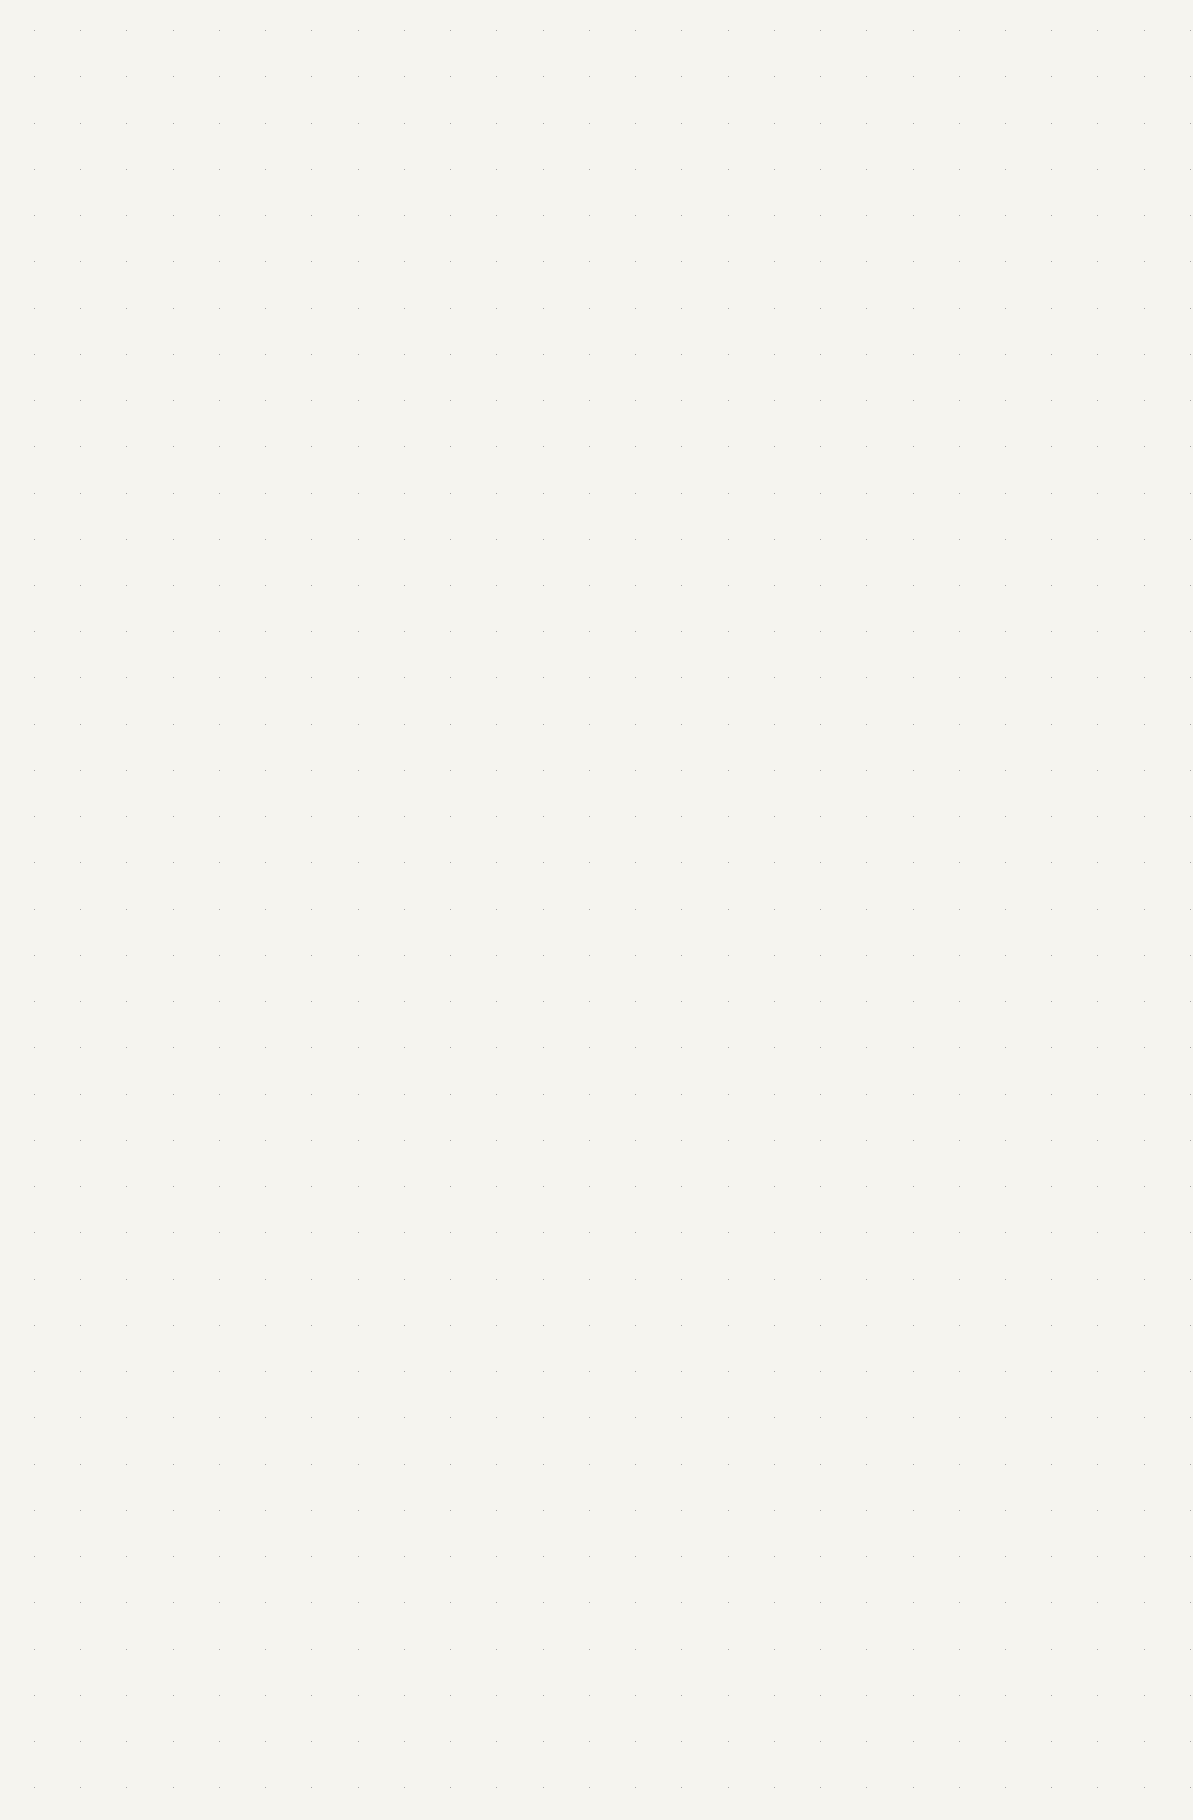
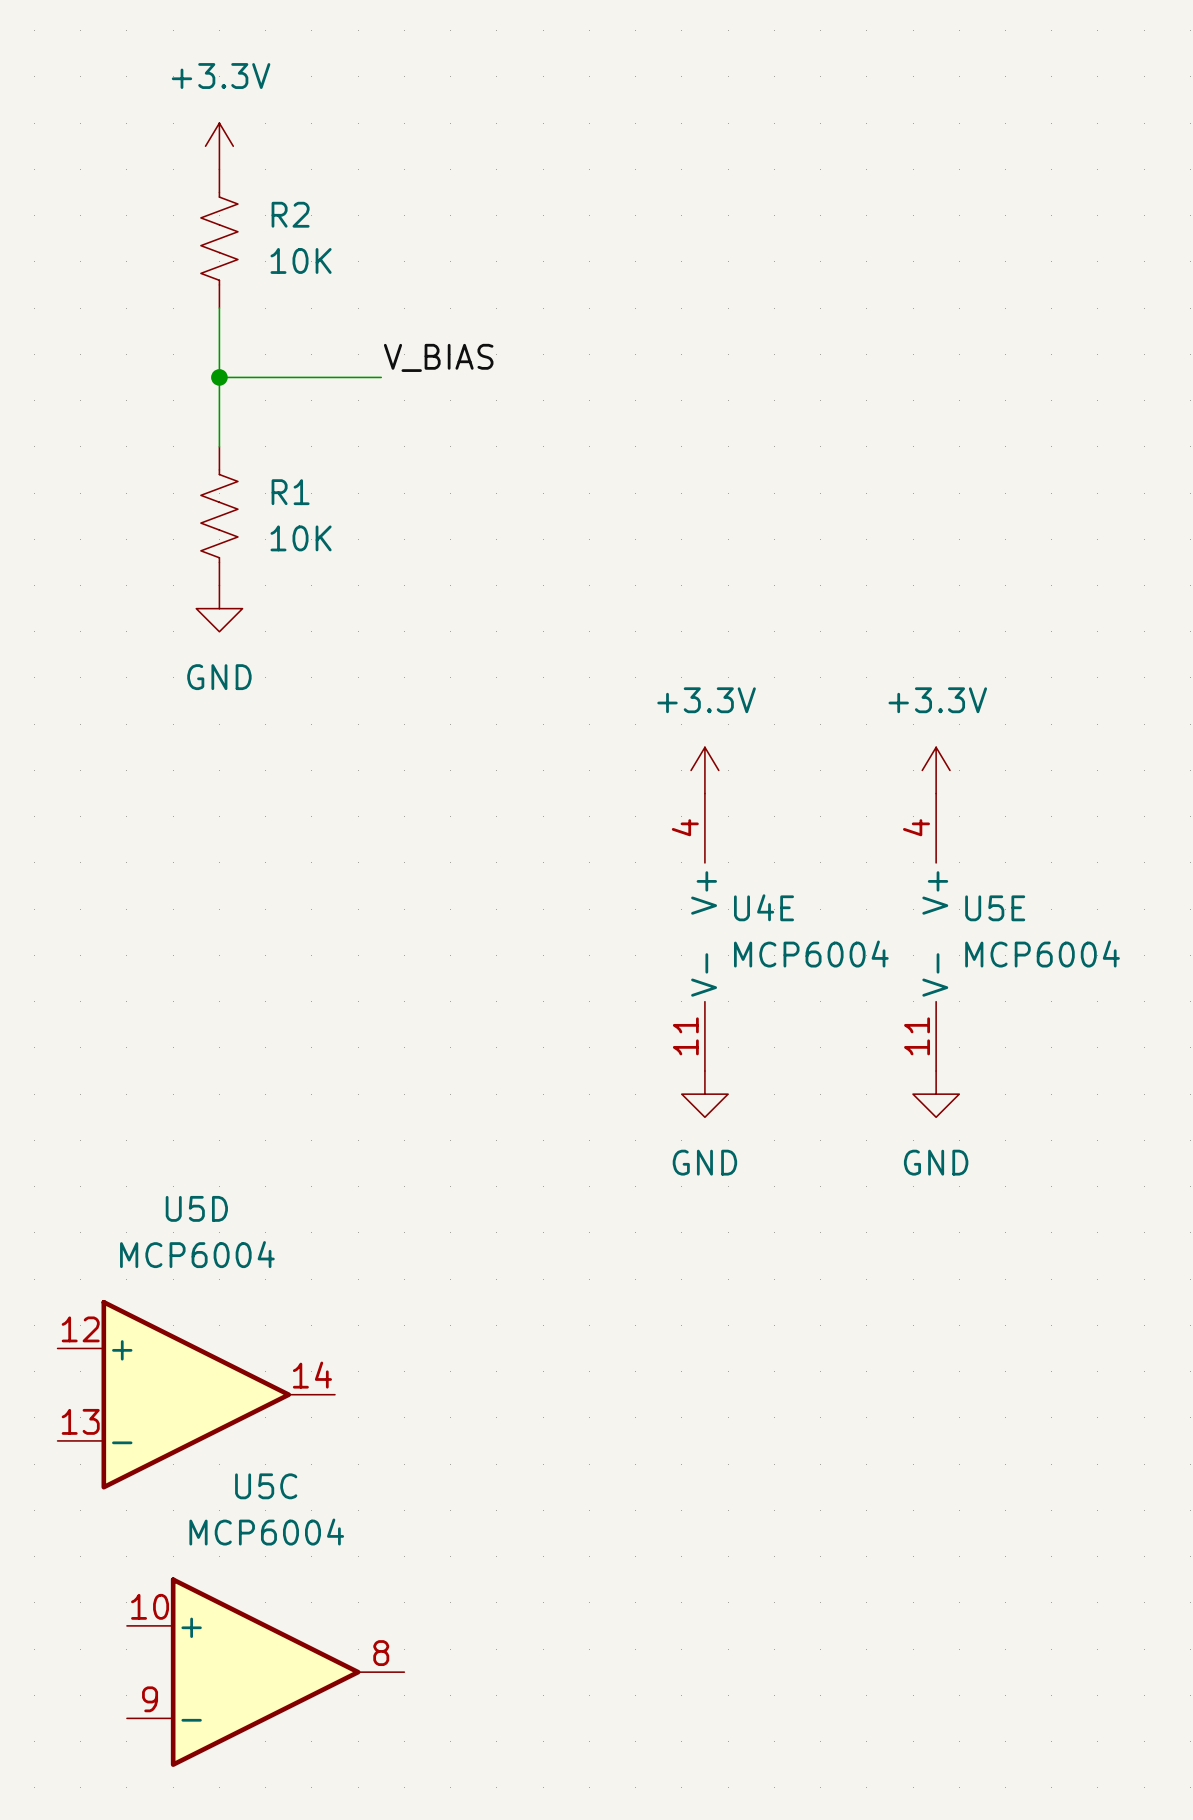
power symbol: none -> +3.3V (219, 146)
R2: none -> 10K (219, 238)
wire: none -> (219, 308) (219, 446)
label: none -> V_BIAS (438, 357)
wire: none -> (219, 377) (381, 377)
junction: none -> (219, 377)
R1: none -> 10K (219, 516)
power symbol: none -> GND (219, 608)
power symbol: none -> +3.3V (704, 770)
power symbol: none -> +3.3V (936, 770)
U4E: none -> MCP6004 (704, 932)
U5E: none -> MCP6004 (936, 932)
power symbol: none -> GND (704, 1094)
power symbol: none -> GND (936, 1094)
U5D: none -> MCP6004 (196, 1394)
U5C: none -> MCP6004 (265, 1672)

